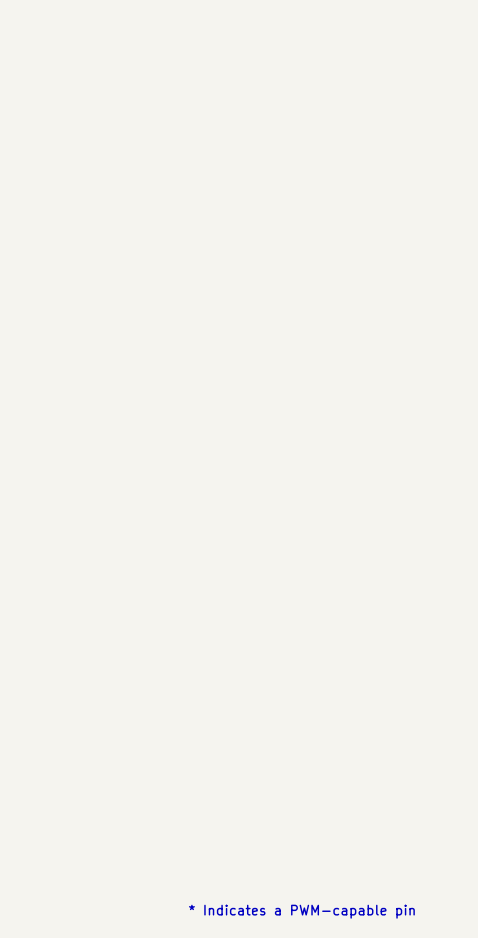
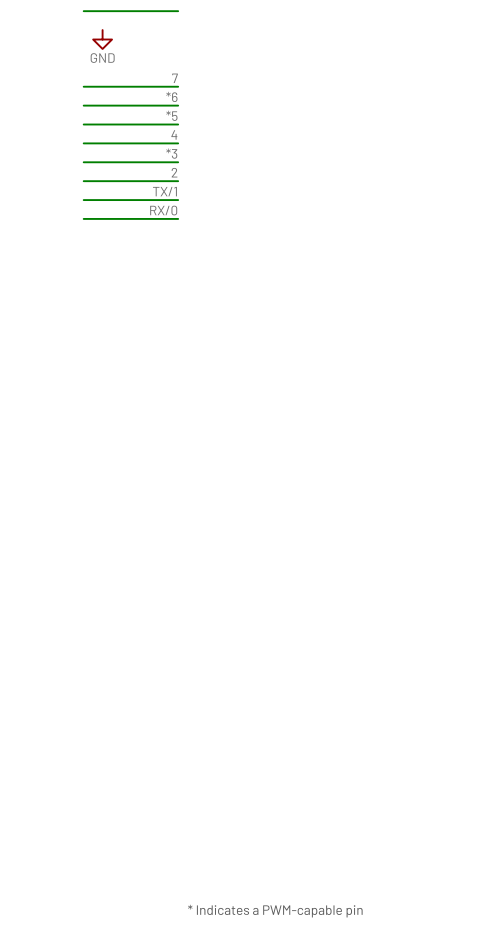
wire: none -> (83, 11) (178, 11)
power symbol: none -> GND (102, 39)
label: none -> 7 (175, 78)
wire: none -> (83, 86) (178, 86)
label: none -> *6 (171, 96)
wire: none -> (83, 105) (178, 105)
label: none -> *5 (171, 115)
wire: none -> (83, 124) (178, 124)
label: none -> 4 (174, 134)
wire: none -> (83, 143) (178, 143)
label: none -> *3 (171, 153)
wire: none -> (83, 162) (178, 162)
label: none -> 2 (174, 172)
wire: none -> (83, 181) (178, 181)
label: none -> TX/1 (164, 191)
wire: none -> (83, 200) (178, 200)
label: none -> RX/0 (163, 210)
wire: none -> (83, 218) (178, 218)

